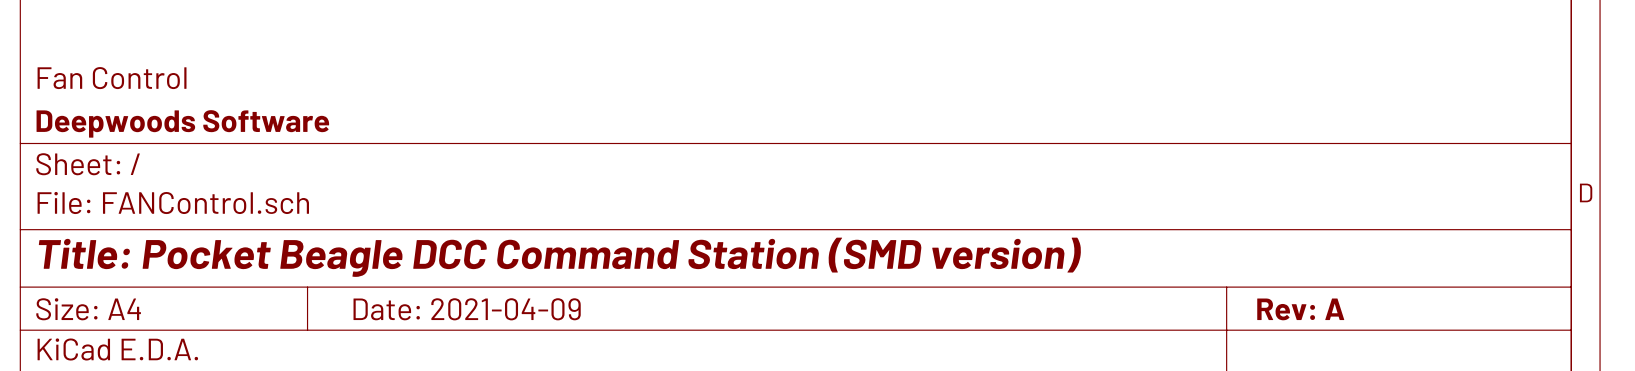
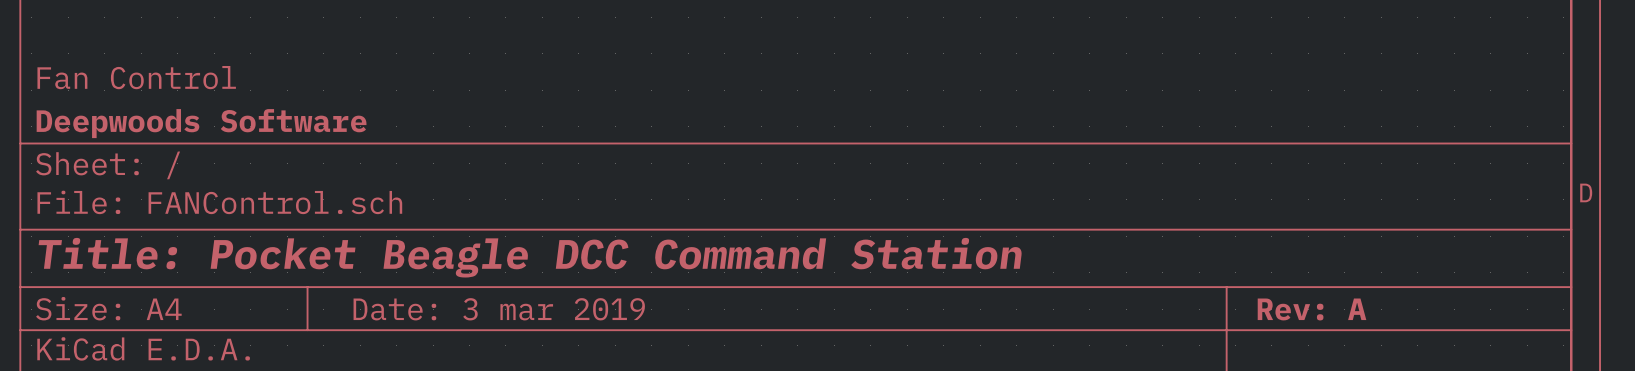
title block: Title: Pocket Beagle DCC Command Station (SMD version) (560, 257) -> Title: Pocket Beagle DCC Command Station (530, 257)
title block: Date: 2021-04-09 (467, 309) -> Date: 3 mar 2019 (499, 309)

